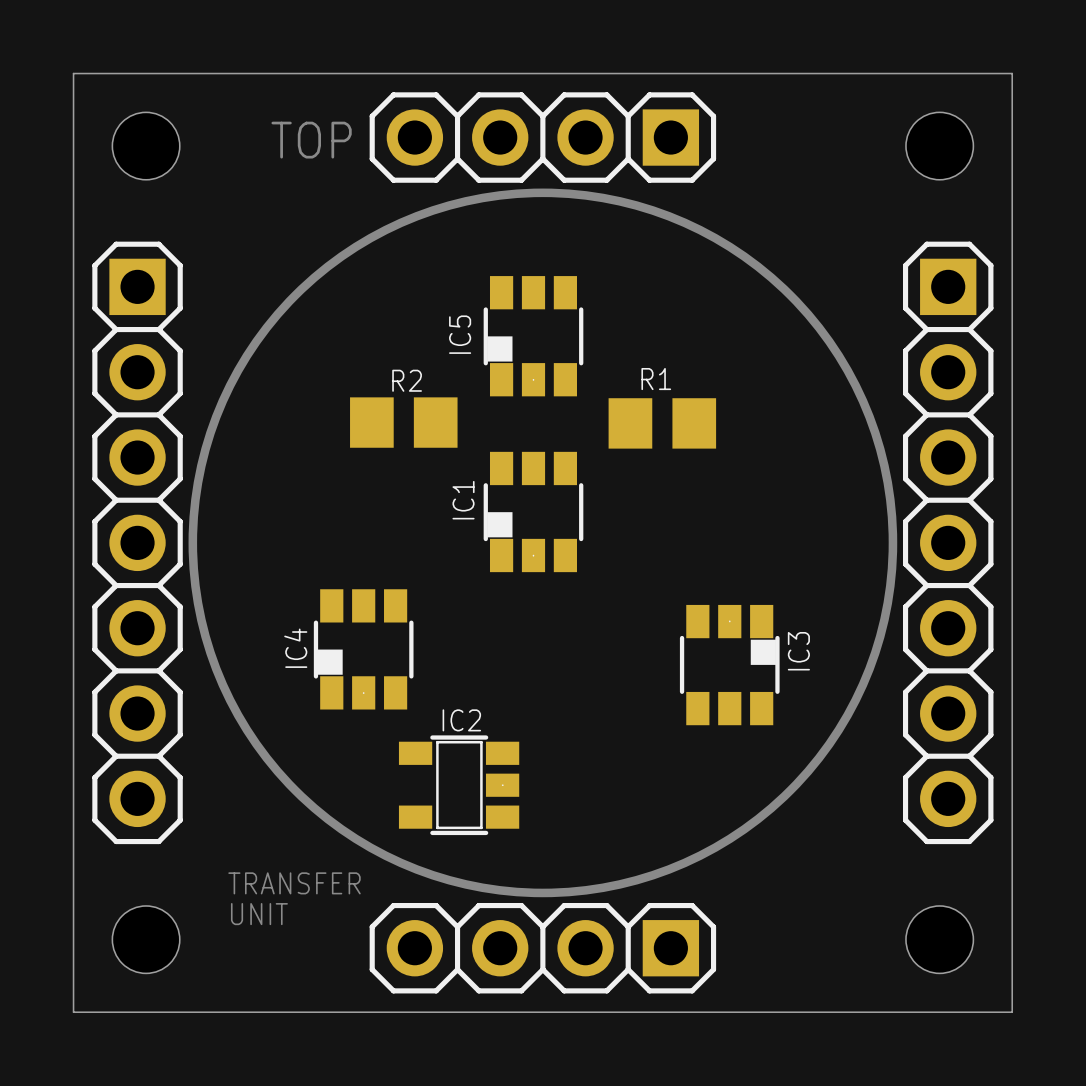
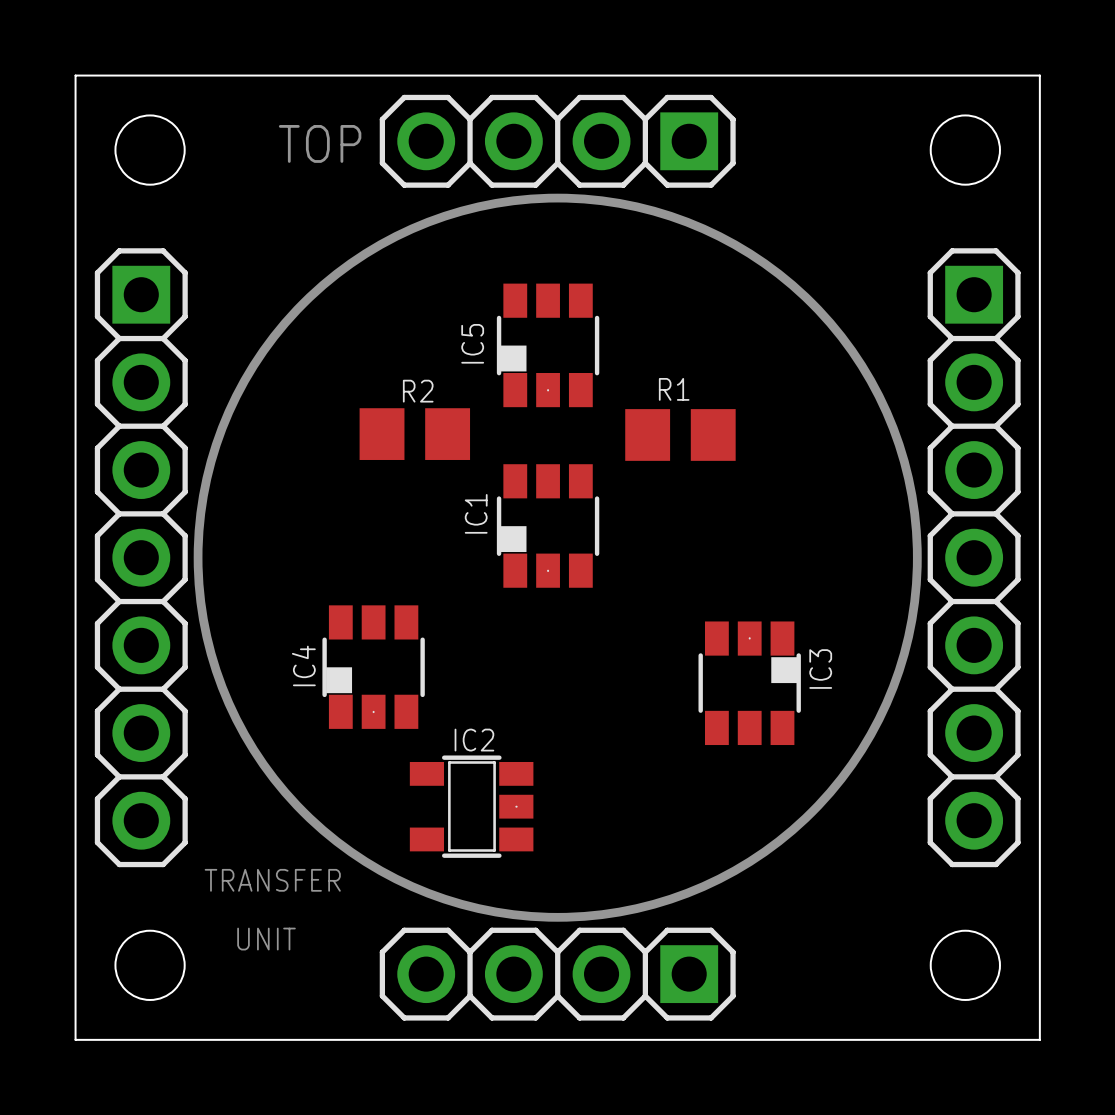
text position: TRANSFER (294, 883) -> TRANSFER (272, 880)

